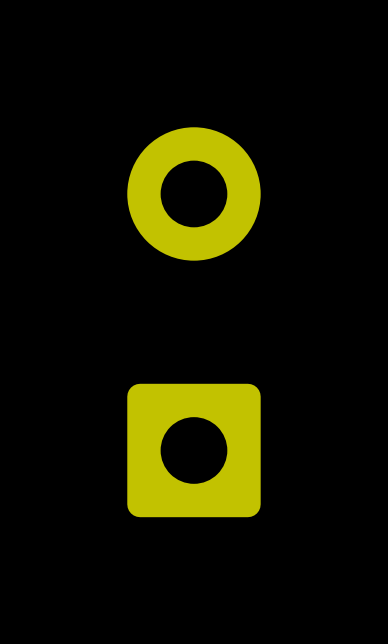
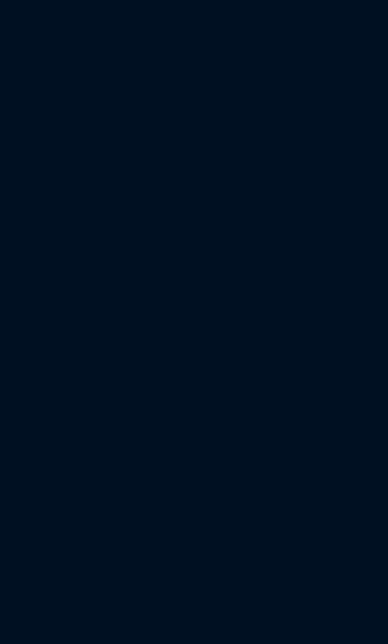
part: (193, 322) -> none

